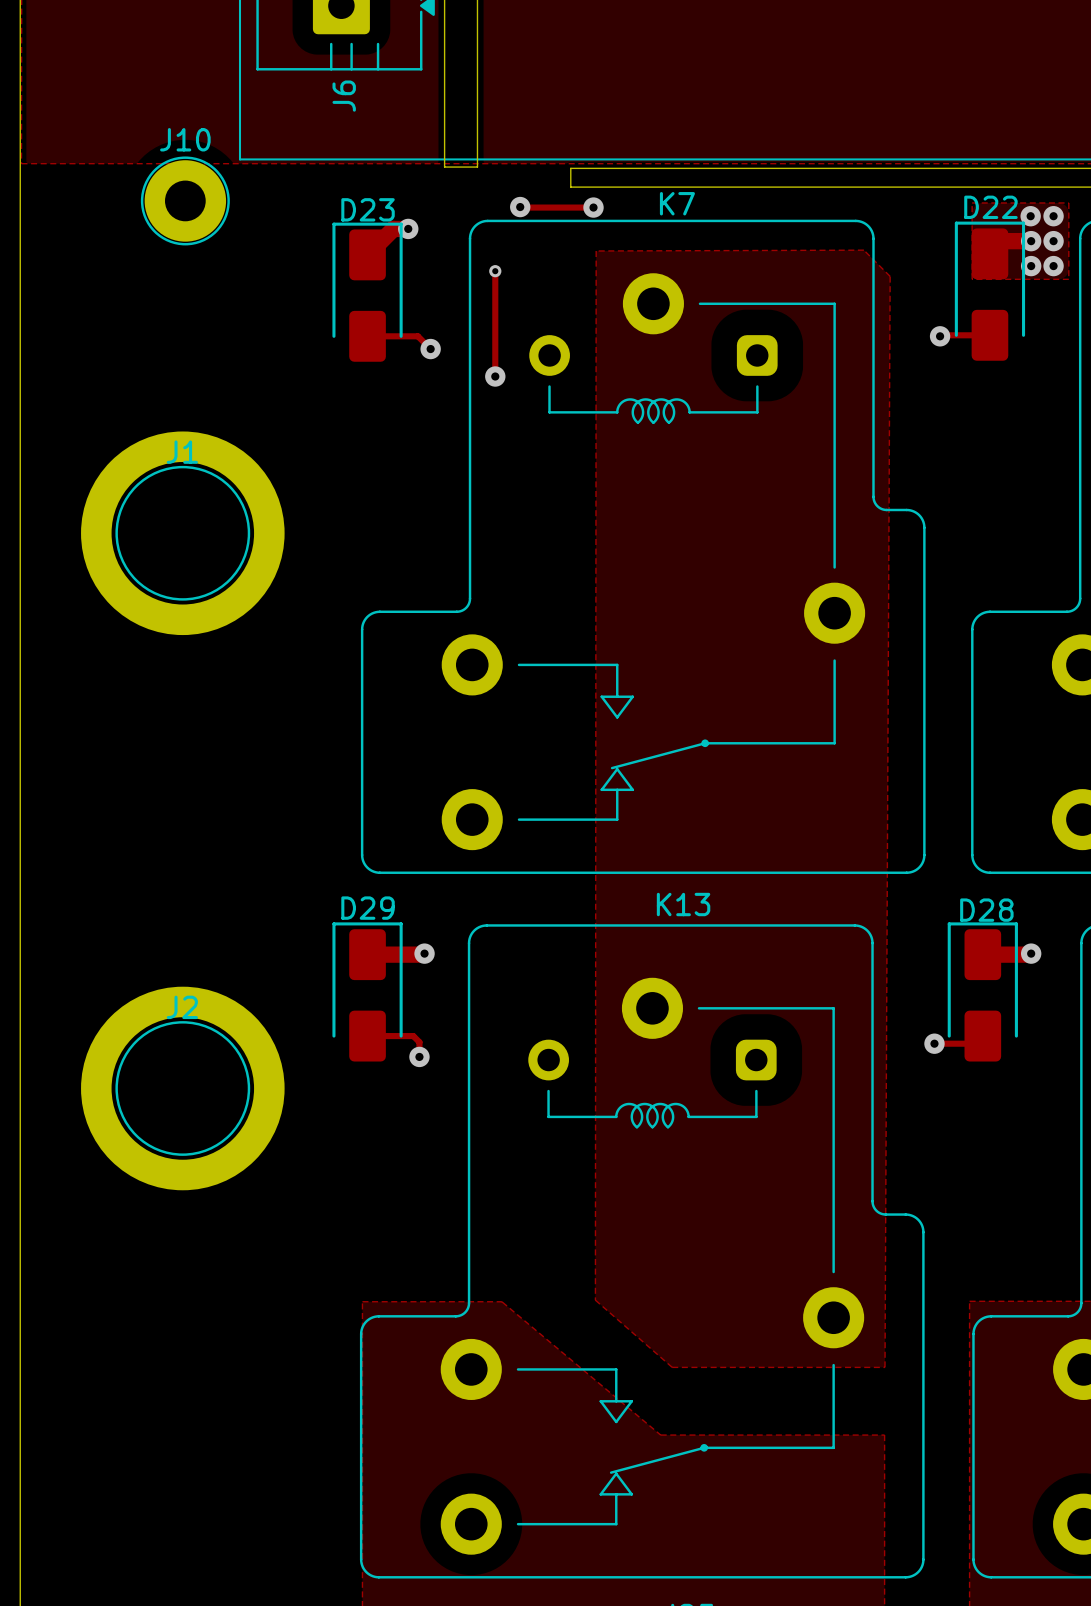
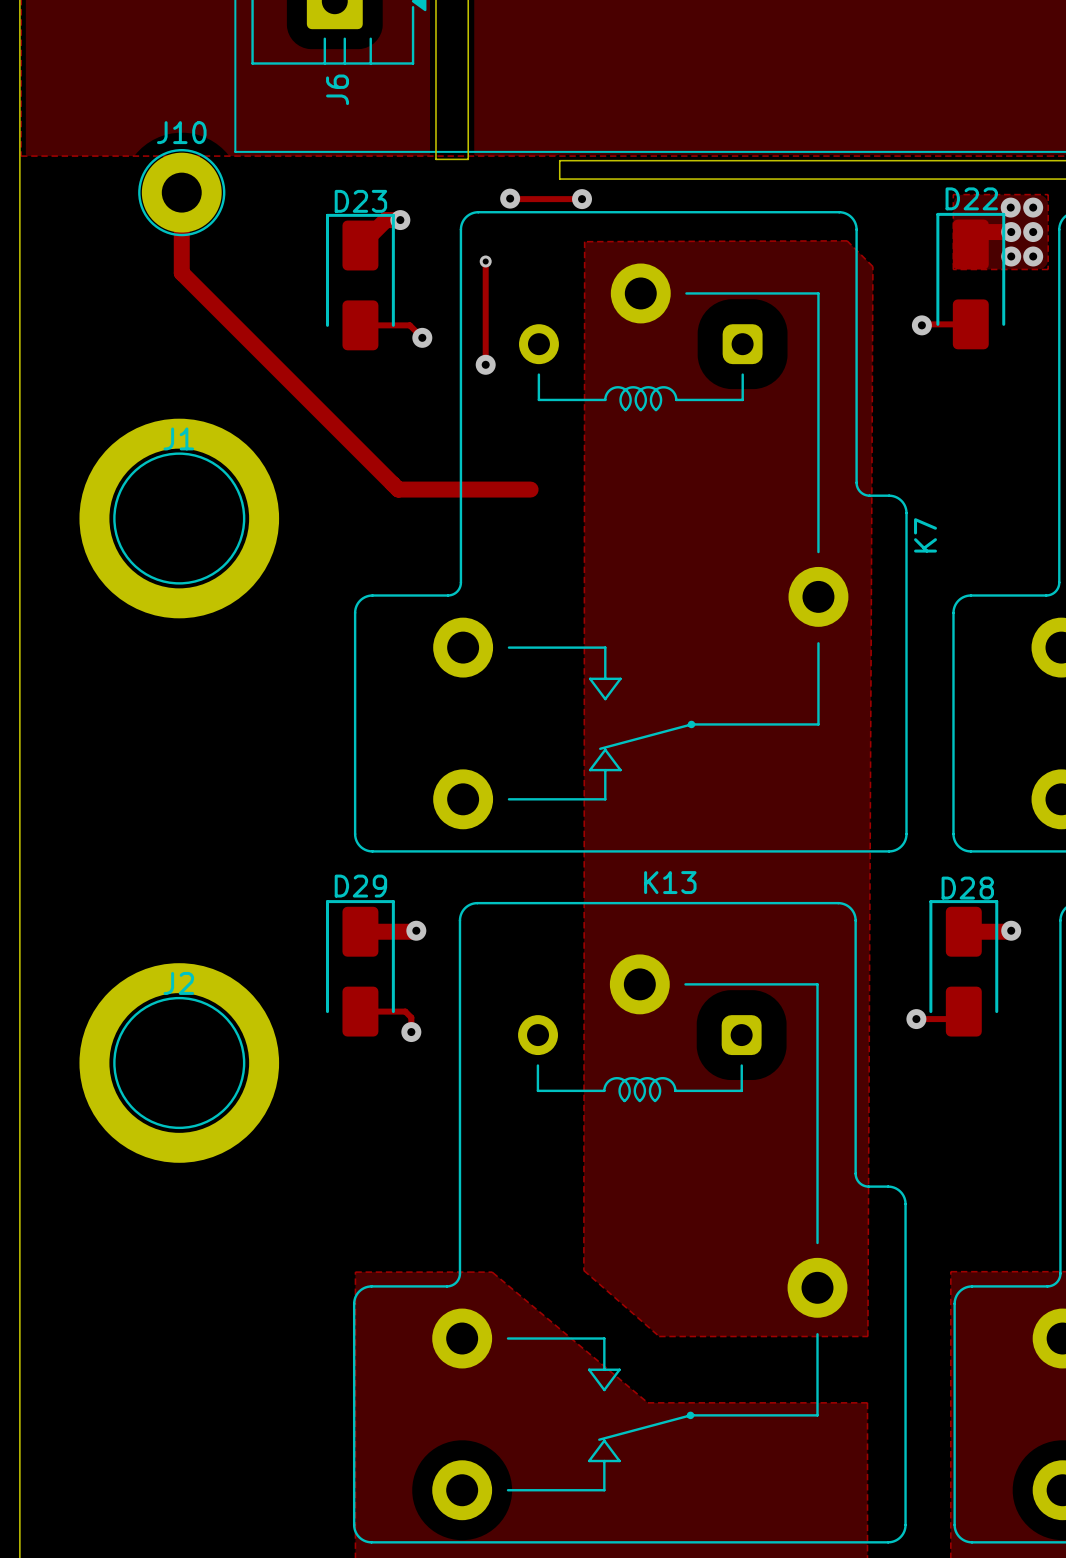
track: none -> (181, 192) (181, 272) (398, 489) (530, 489)
K7 name rotation: 0° (677, 203) -> 90° counterclockwise (925, 535)
K7 name position: K7 (677, 203) -> K7 (925, 535)

